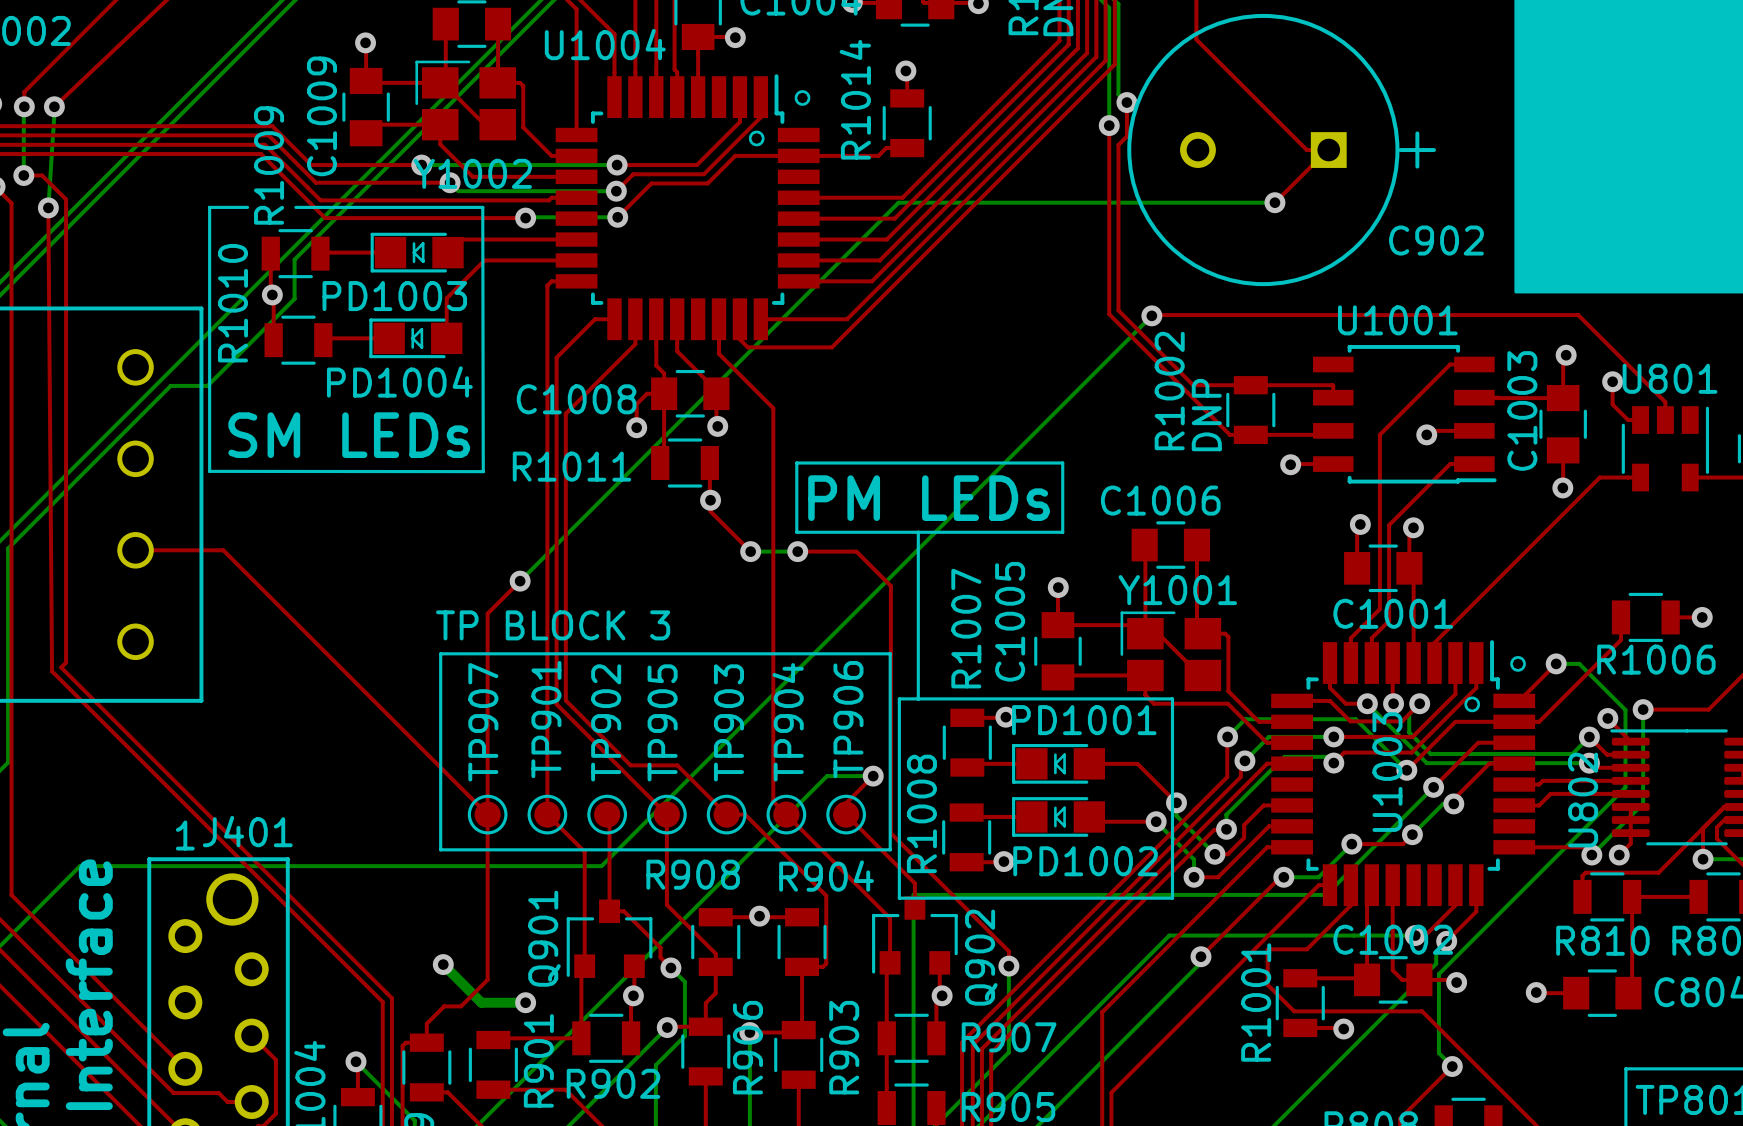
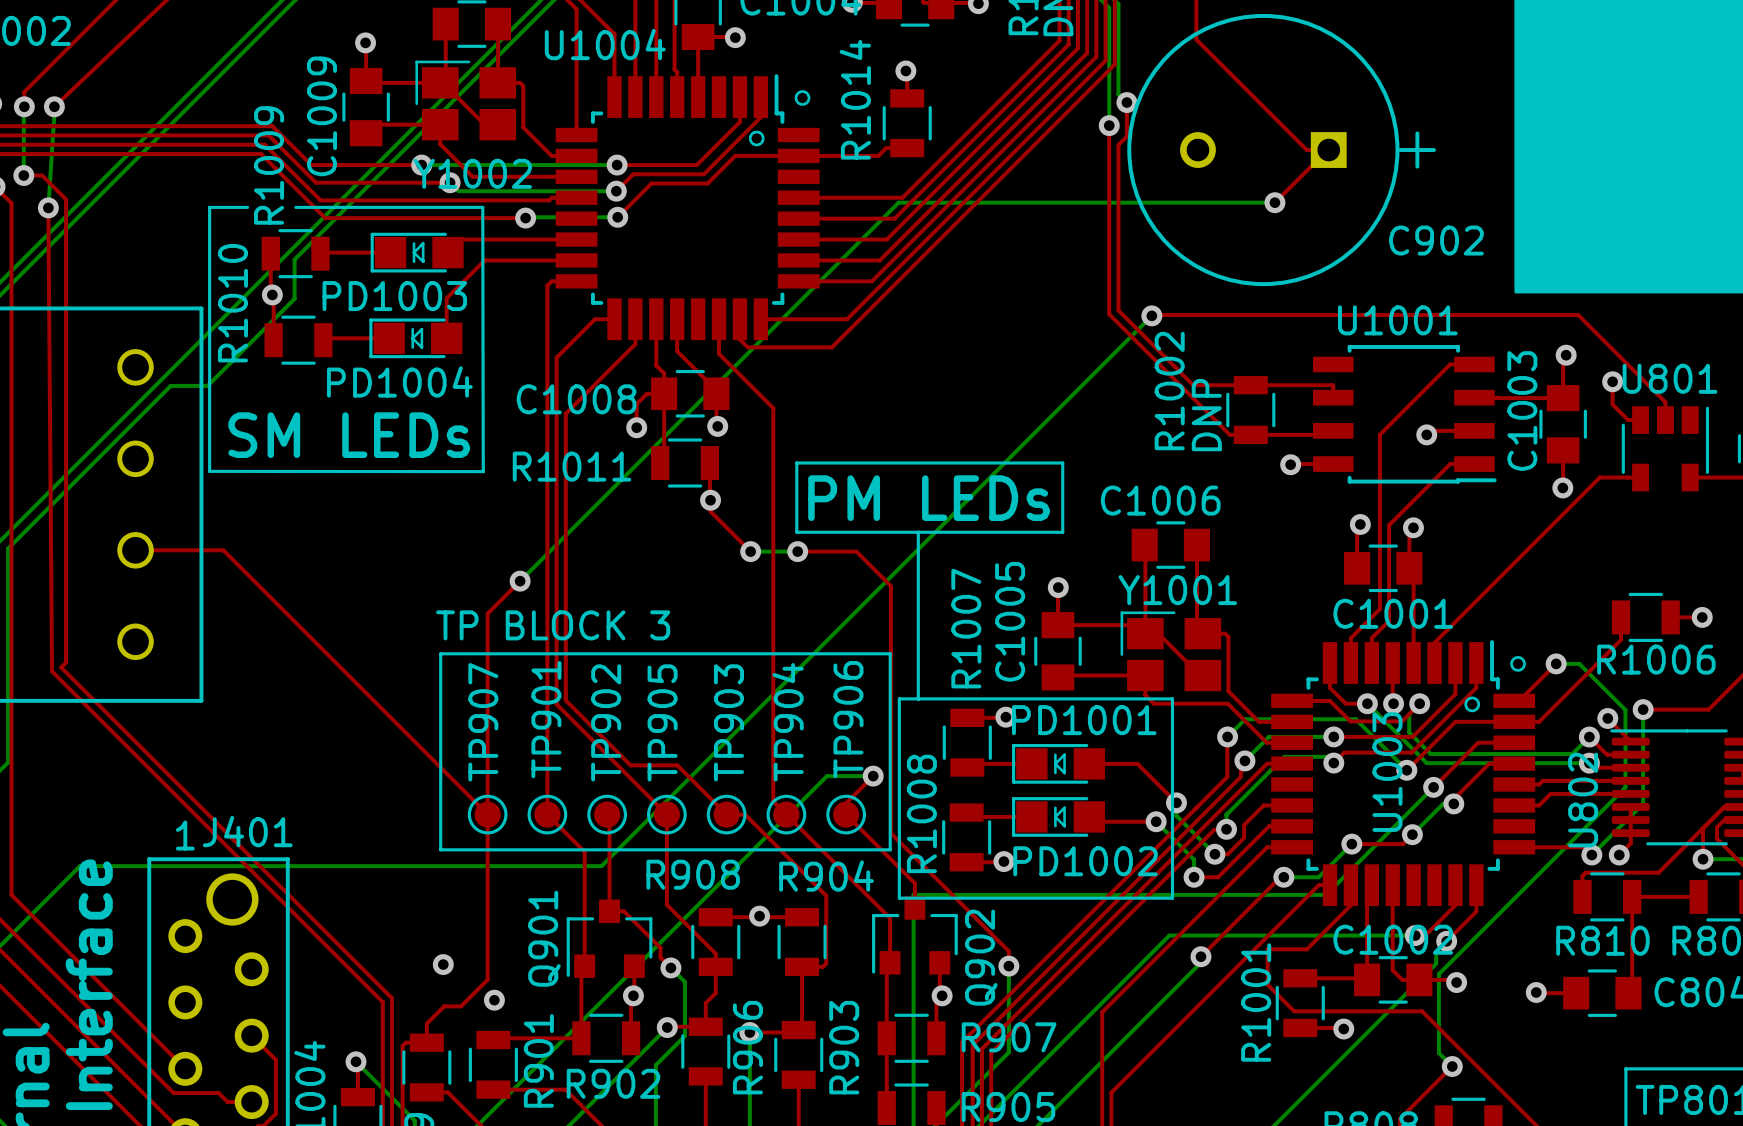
bottom track: (443, 964) (481, 1002) (525, 1002) -> none
via position: (525, 1002) -> (494, 1000)

